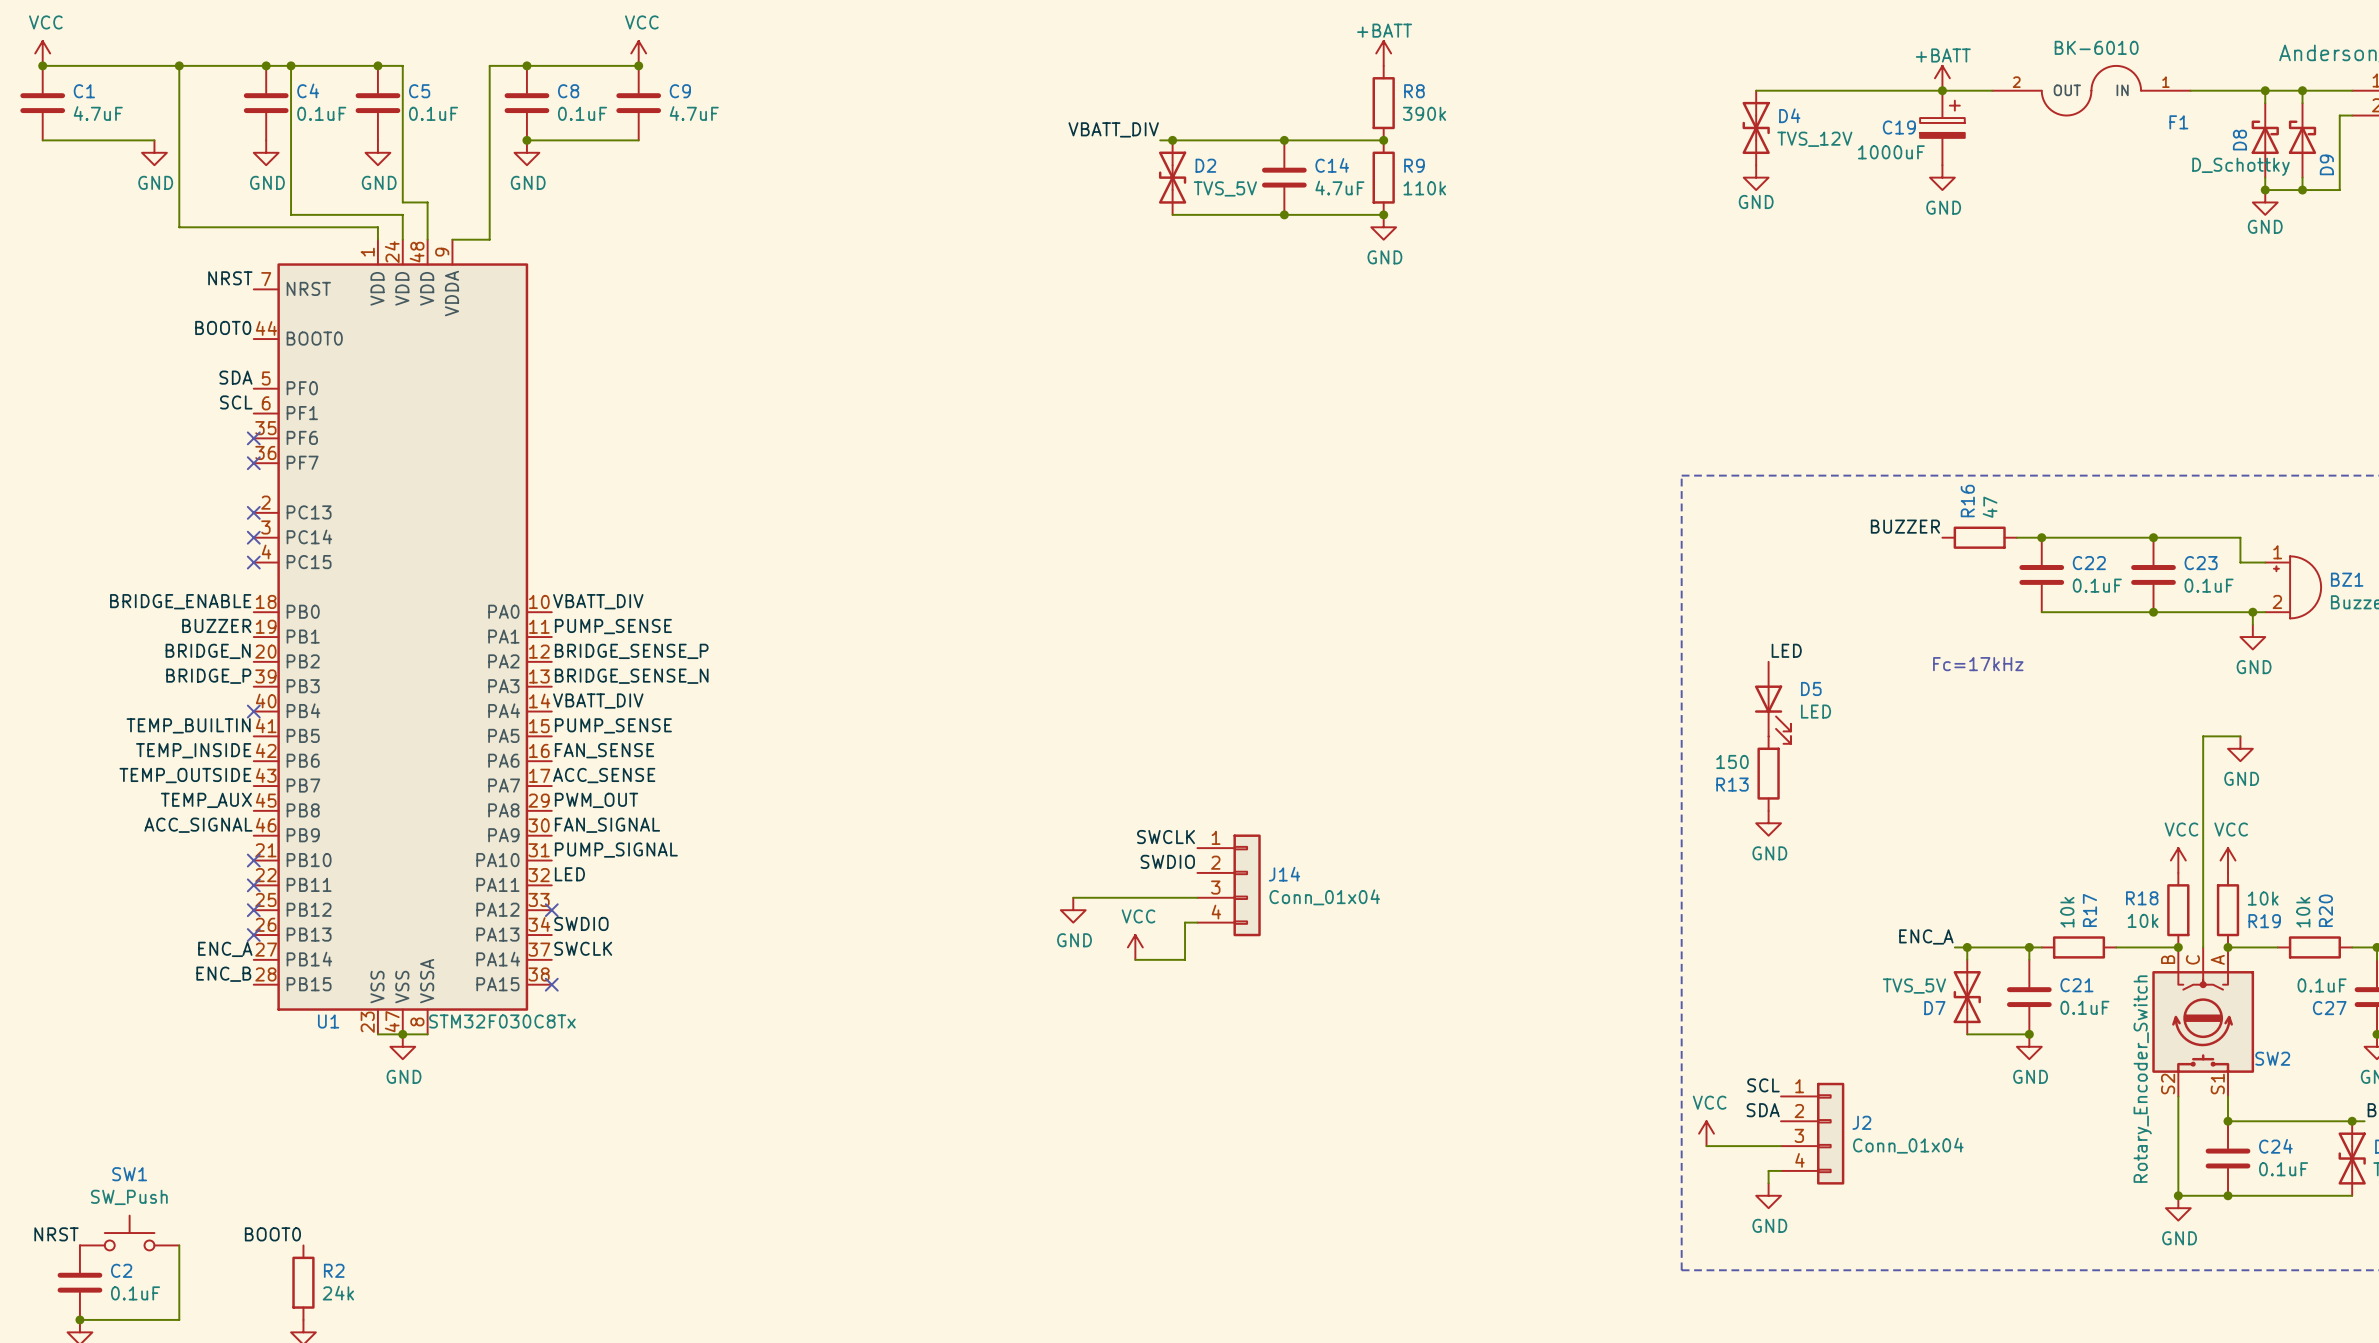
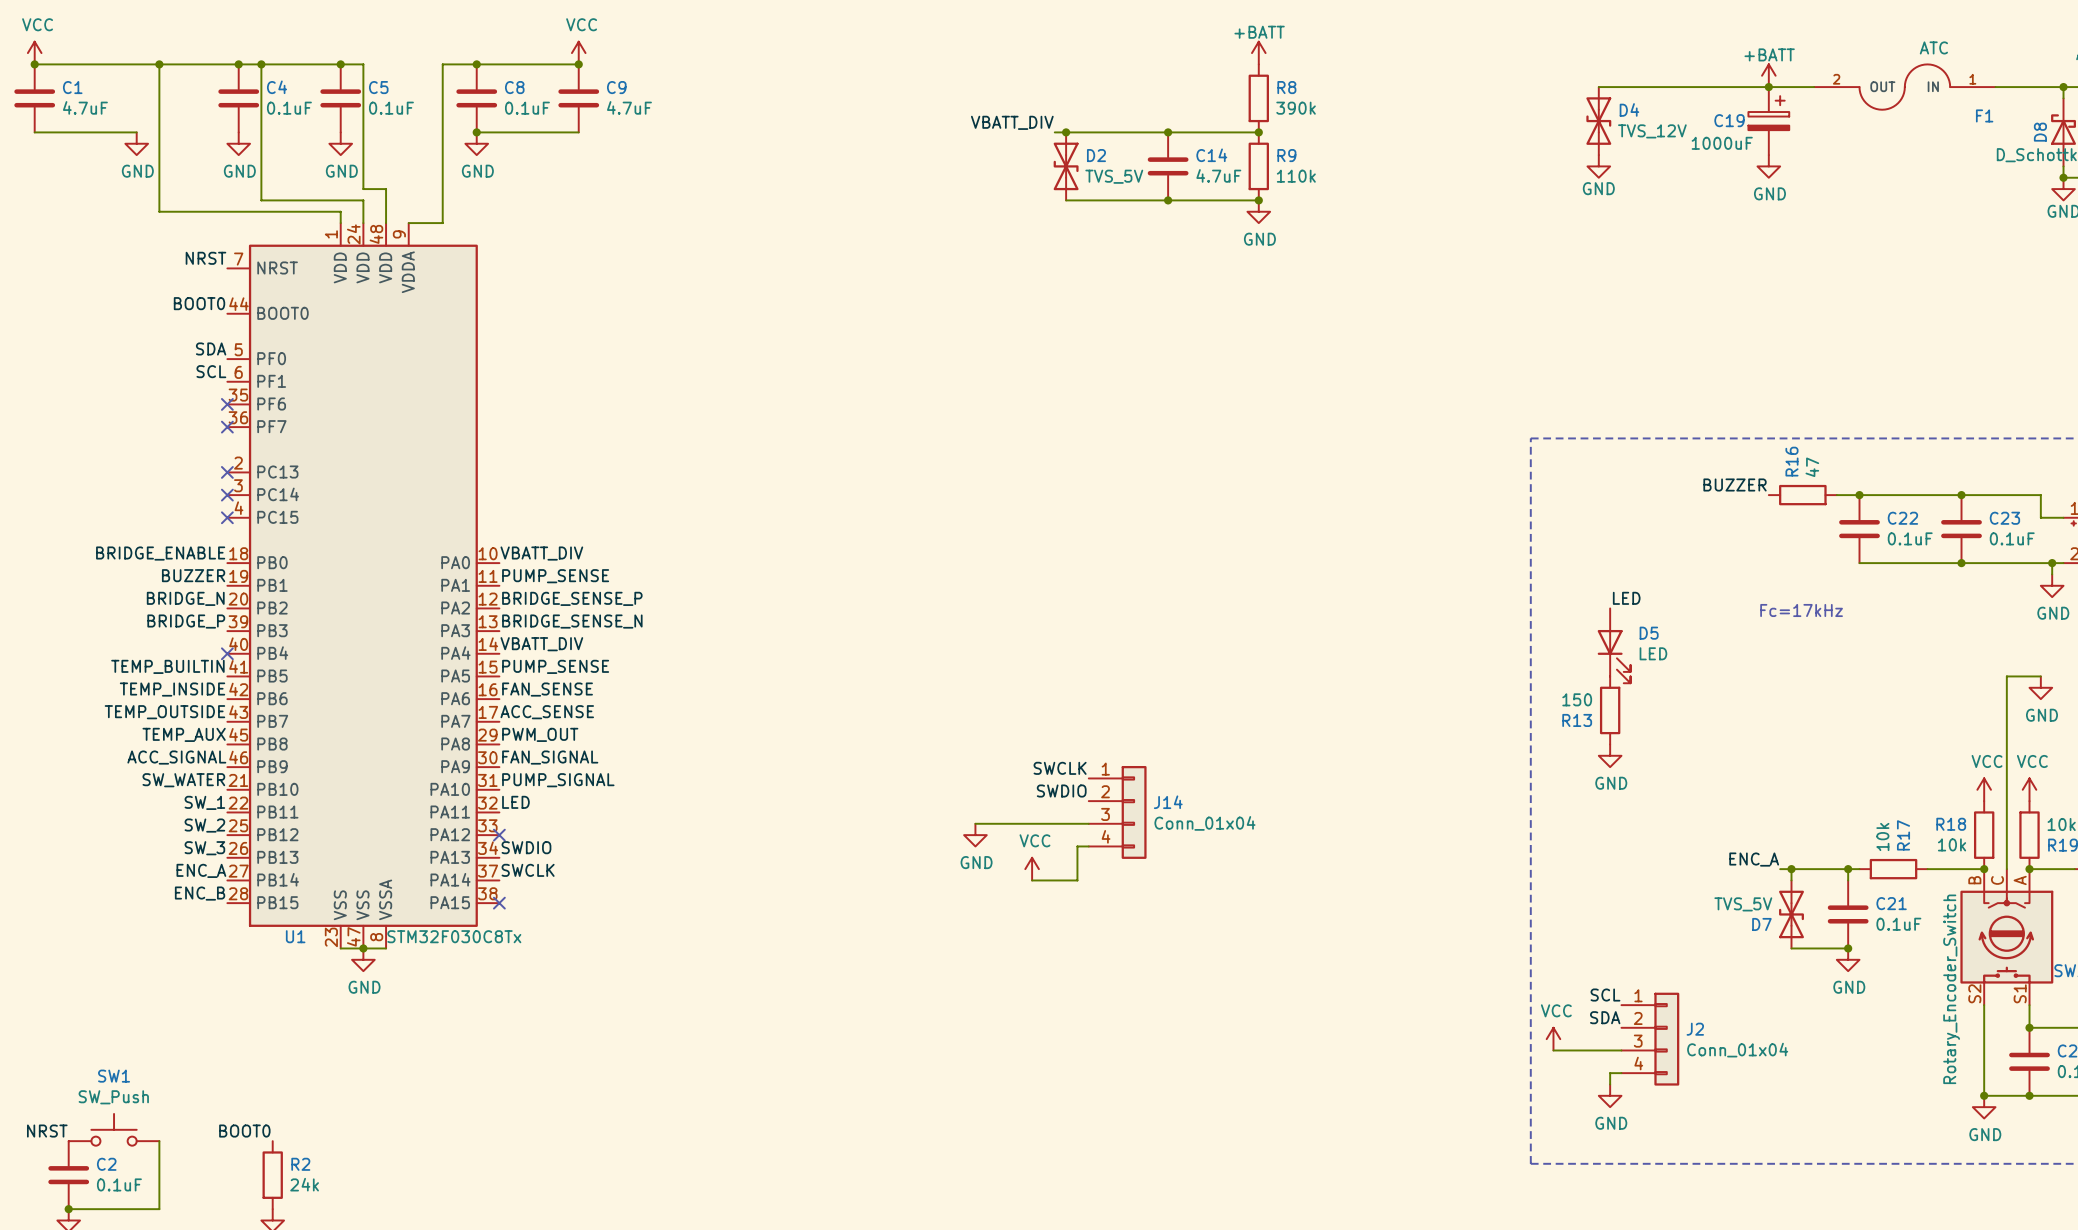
F1 value: BK-6010 (2096, 47) -> ATC (1933, 47)
label: none -> SW_WATER (183, 780)
no-connect mark: (253, 860) -> none
label: none -> SW_1 (204, 802)
no-connect mark: (253, 885) -> none
label: none -> SW_2 (204, 825)
no-connect mark: (253, 910) -> none
label: none -> SW_3 (204, 848)
no-connect mark: (253, 935) -> none

